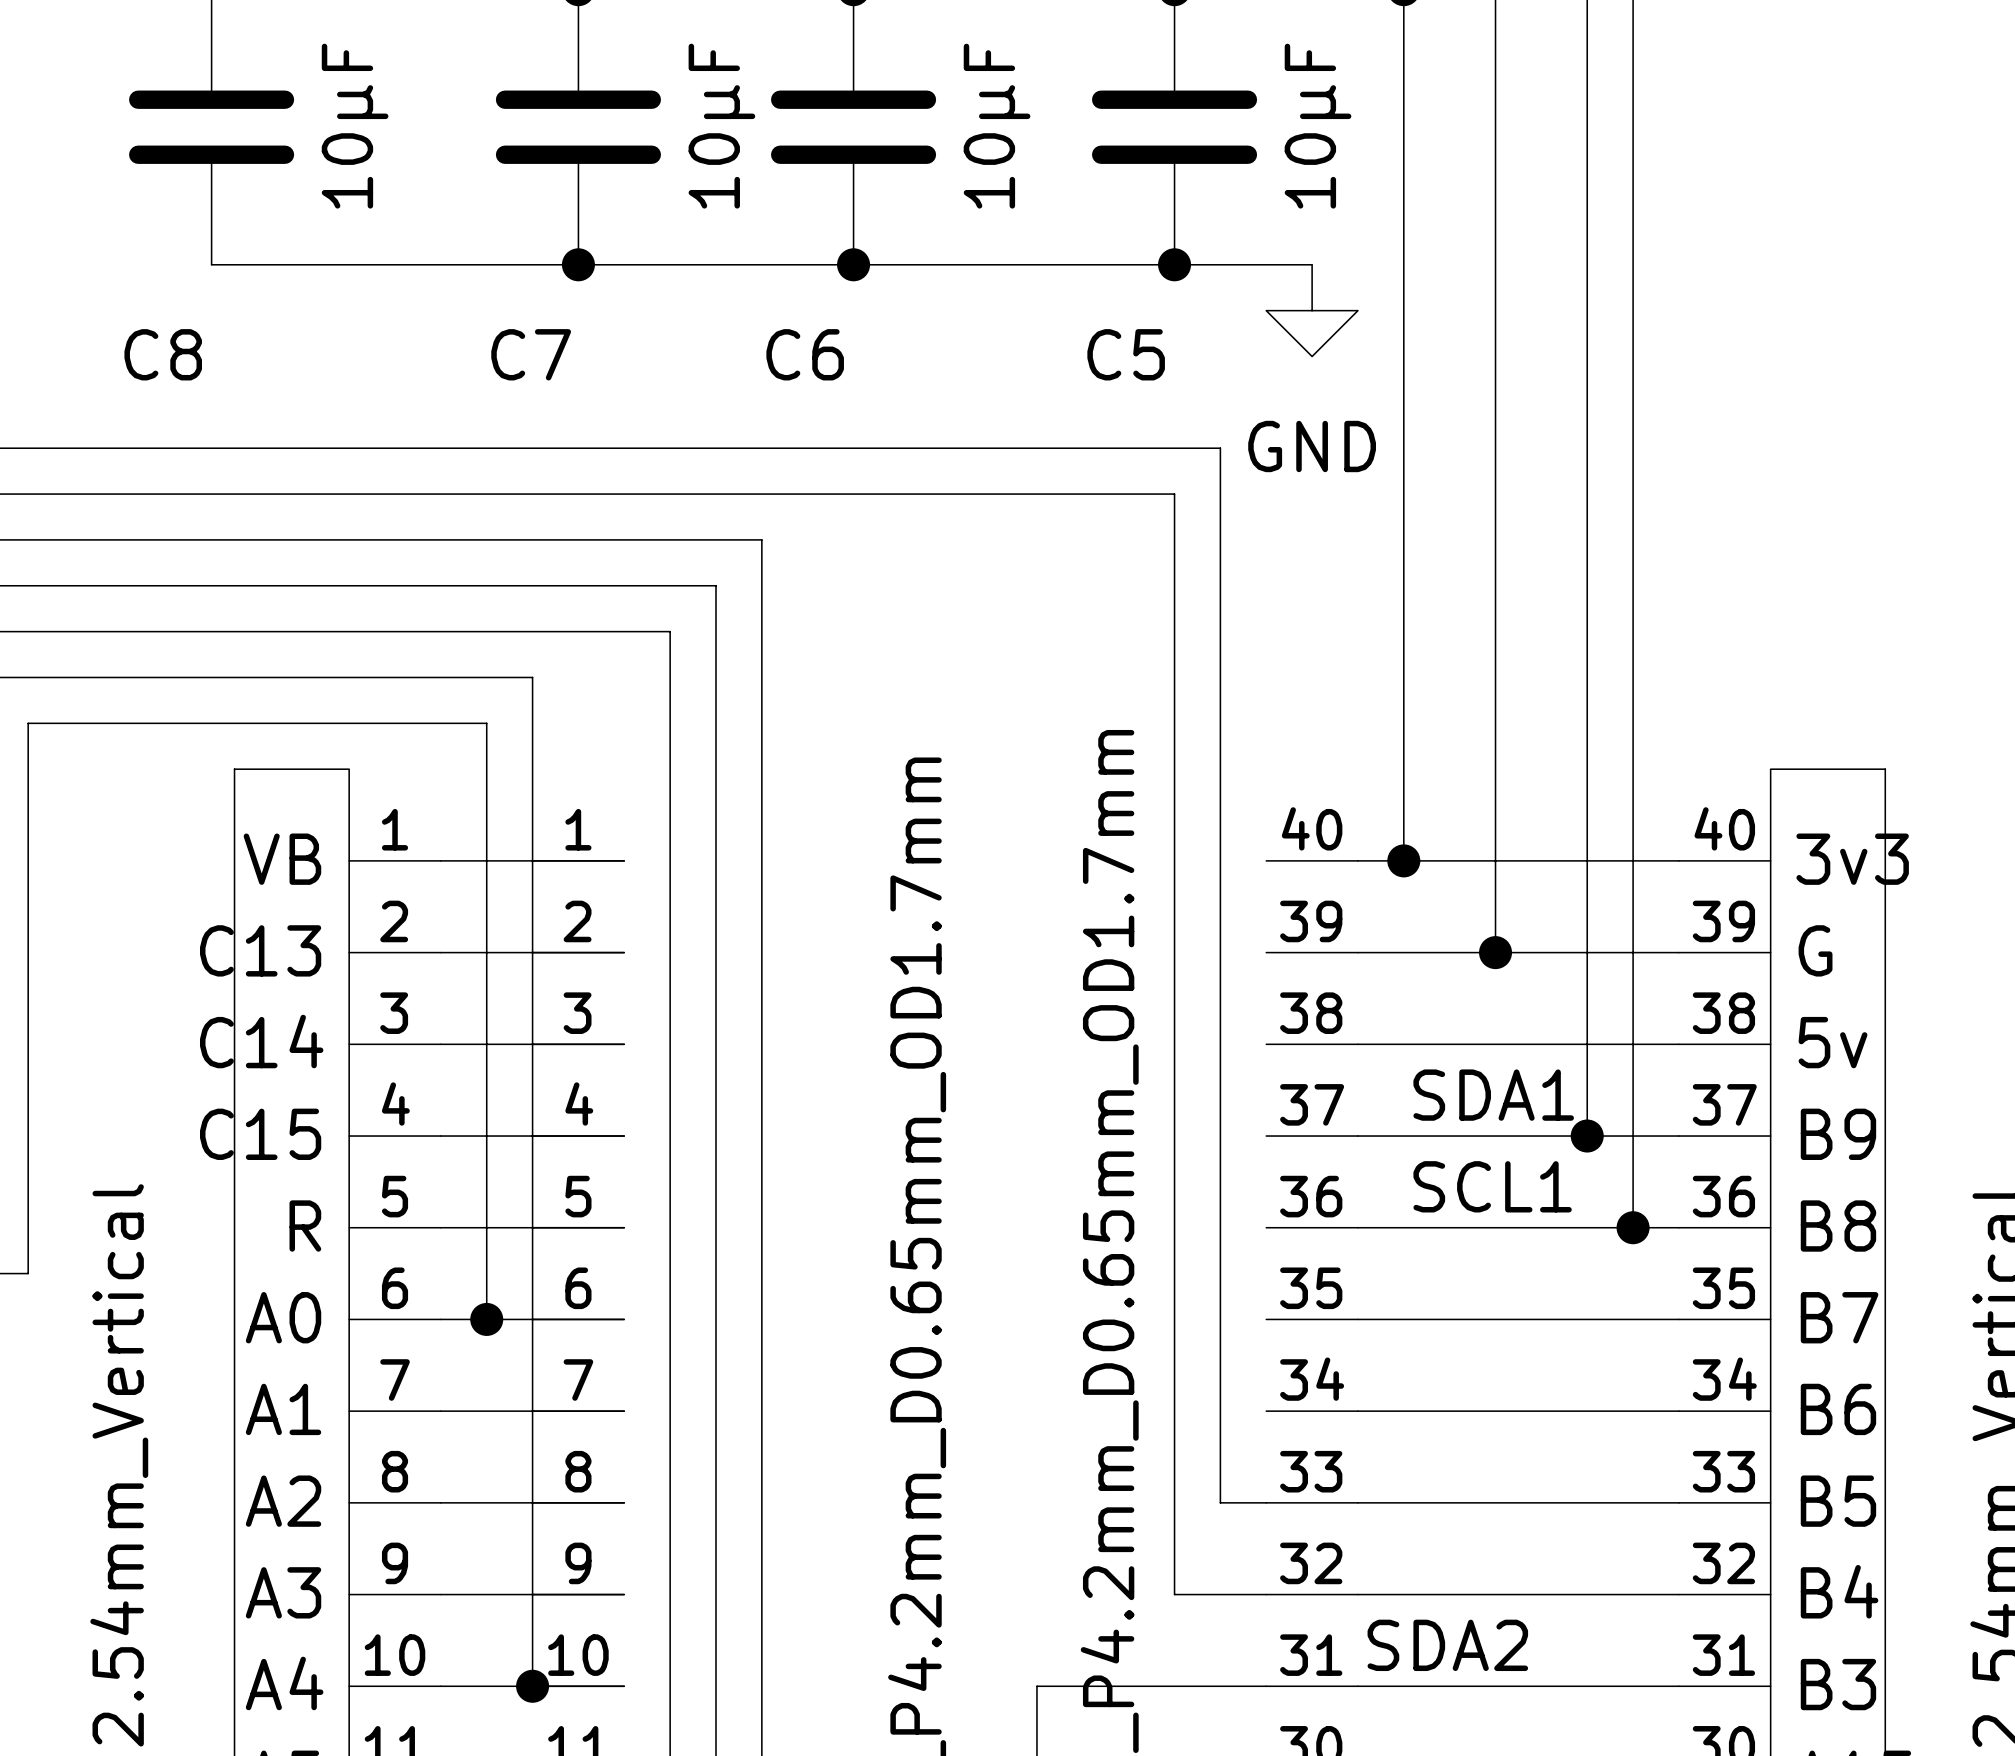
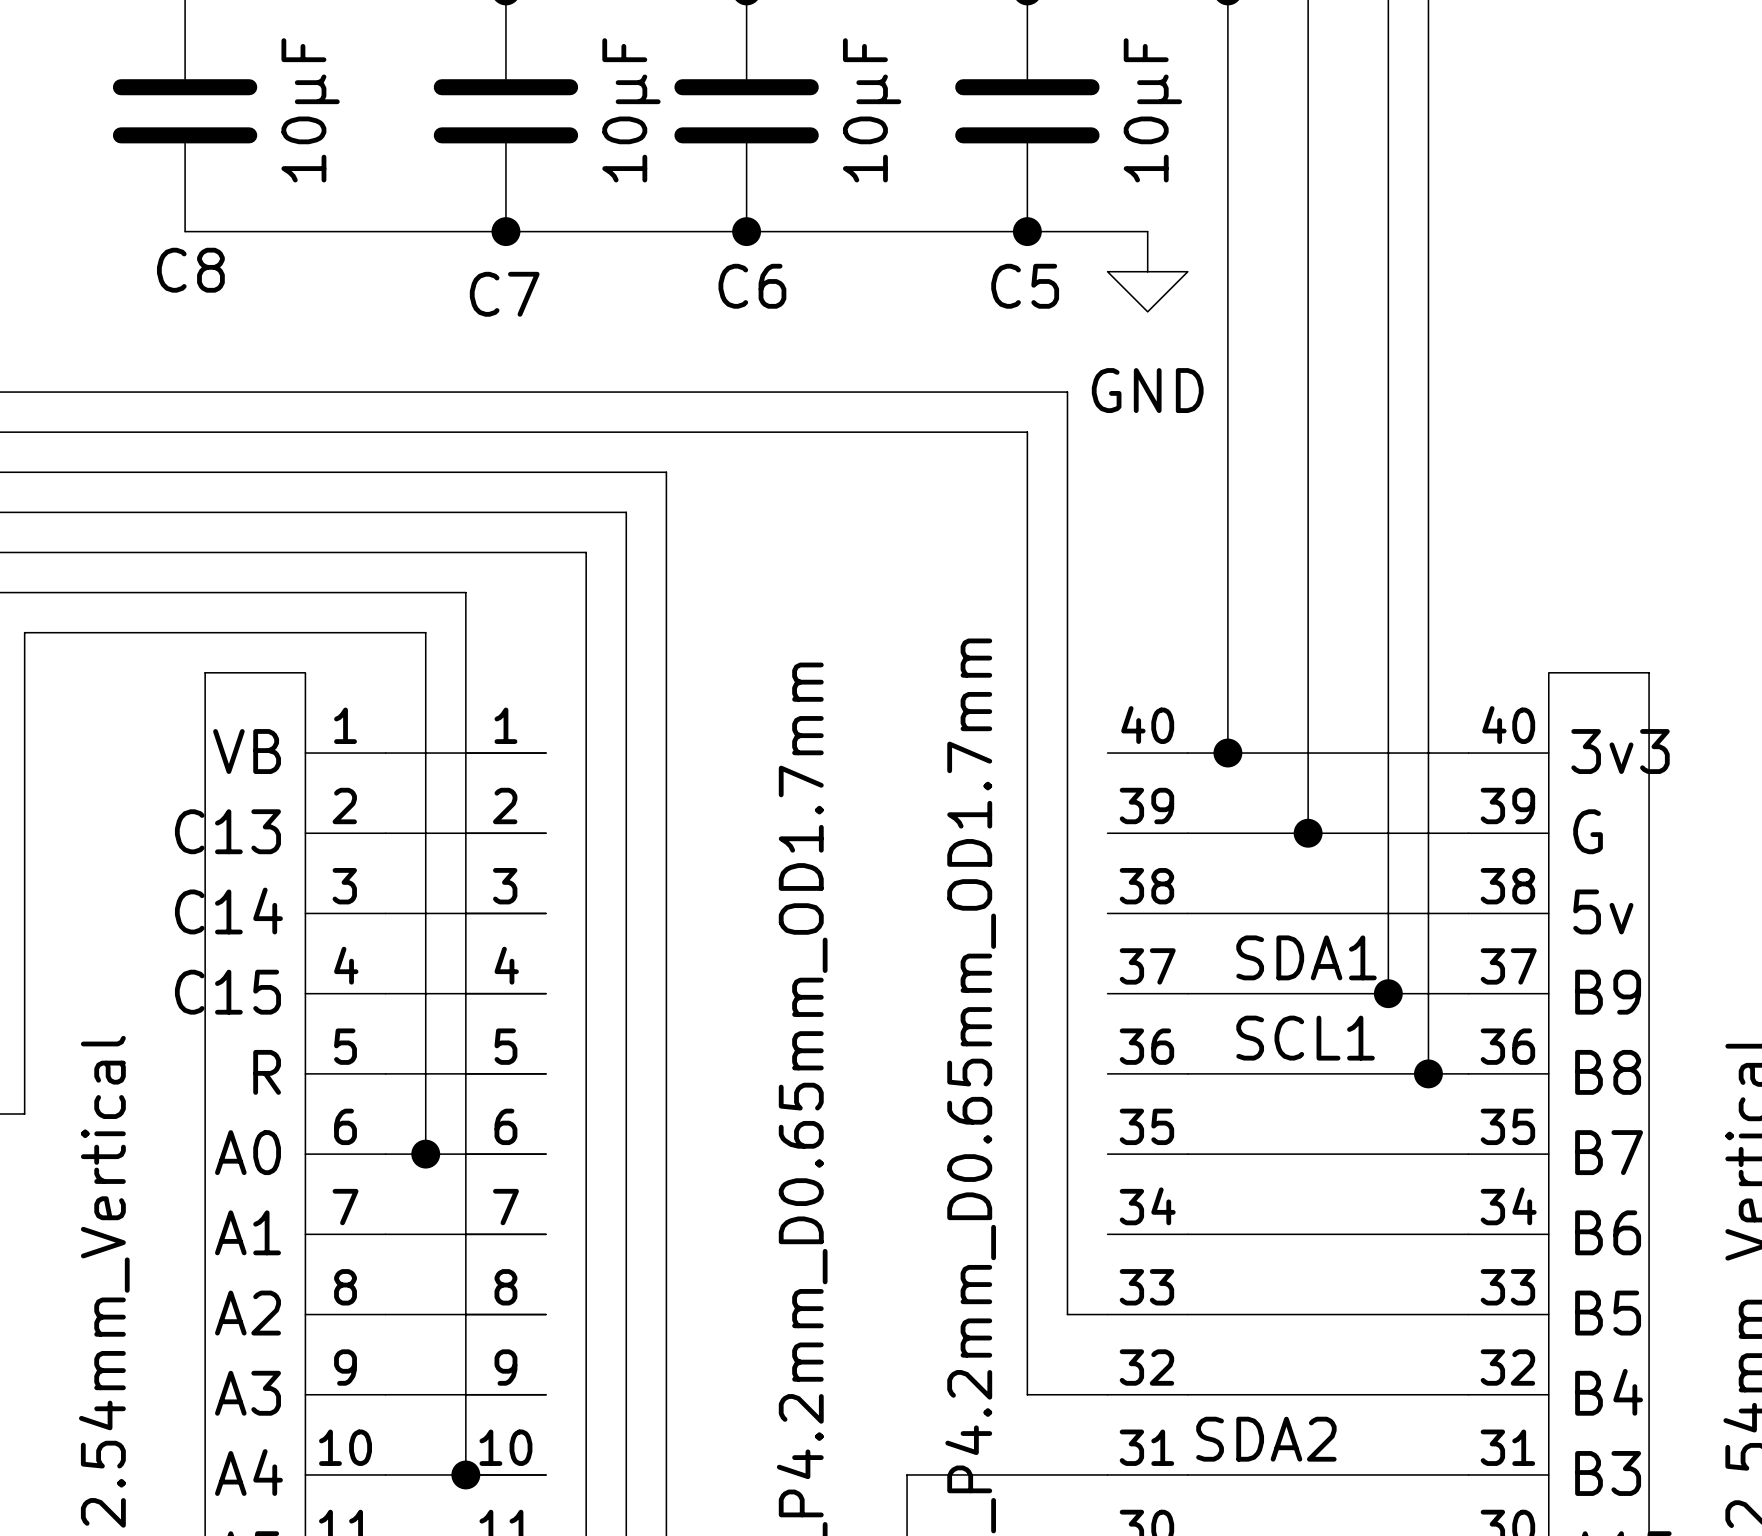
C8 name position: C8 (163, 354) -> C8 (190, 270)
C7 name position: C7 (531, 354) -> C7 (504, 294)
C6 name position: C6 (805, 354) -> C6 (752, 286)
C5 name position: C5 (1126, 354) -> C5 (1025, 286)

